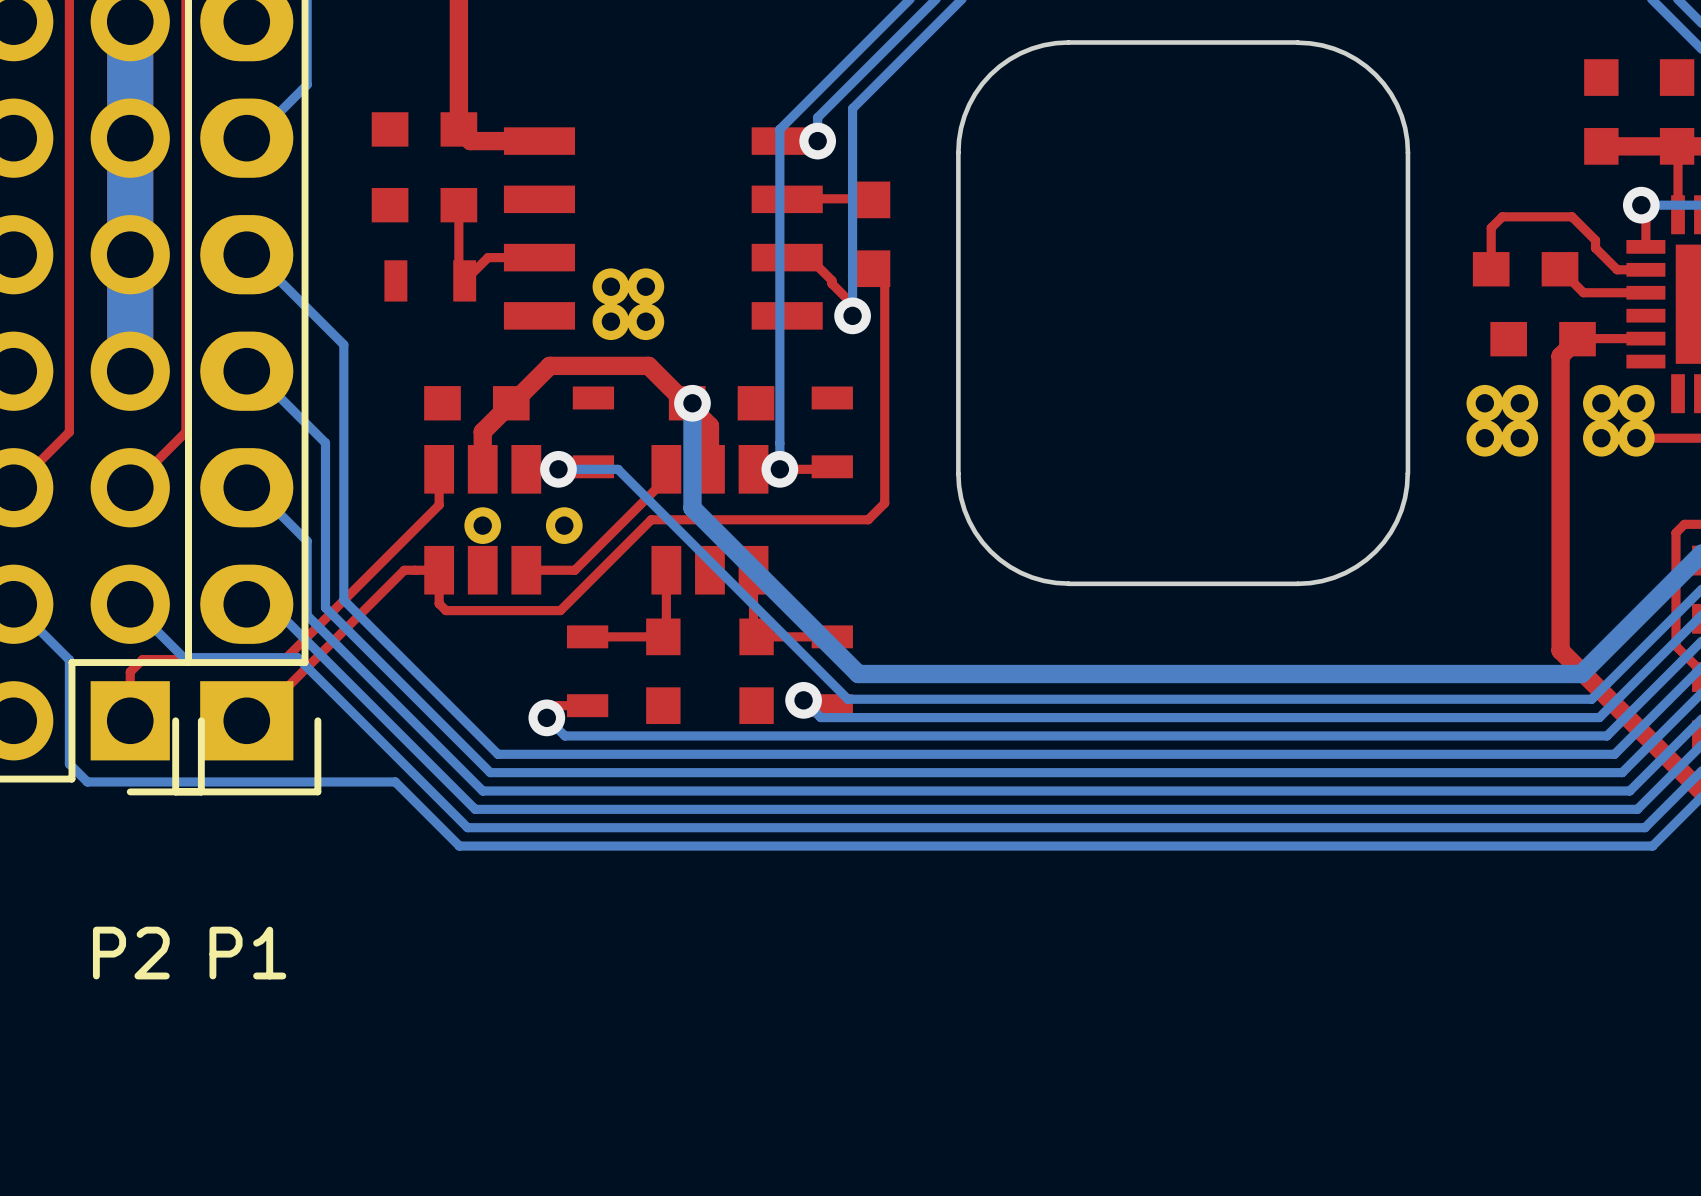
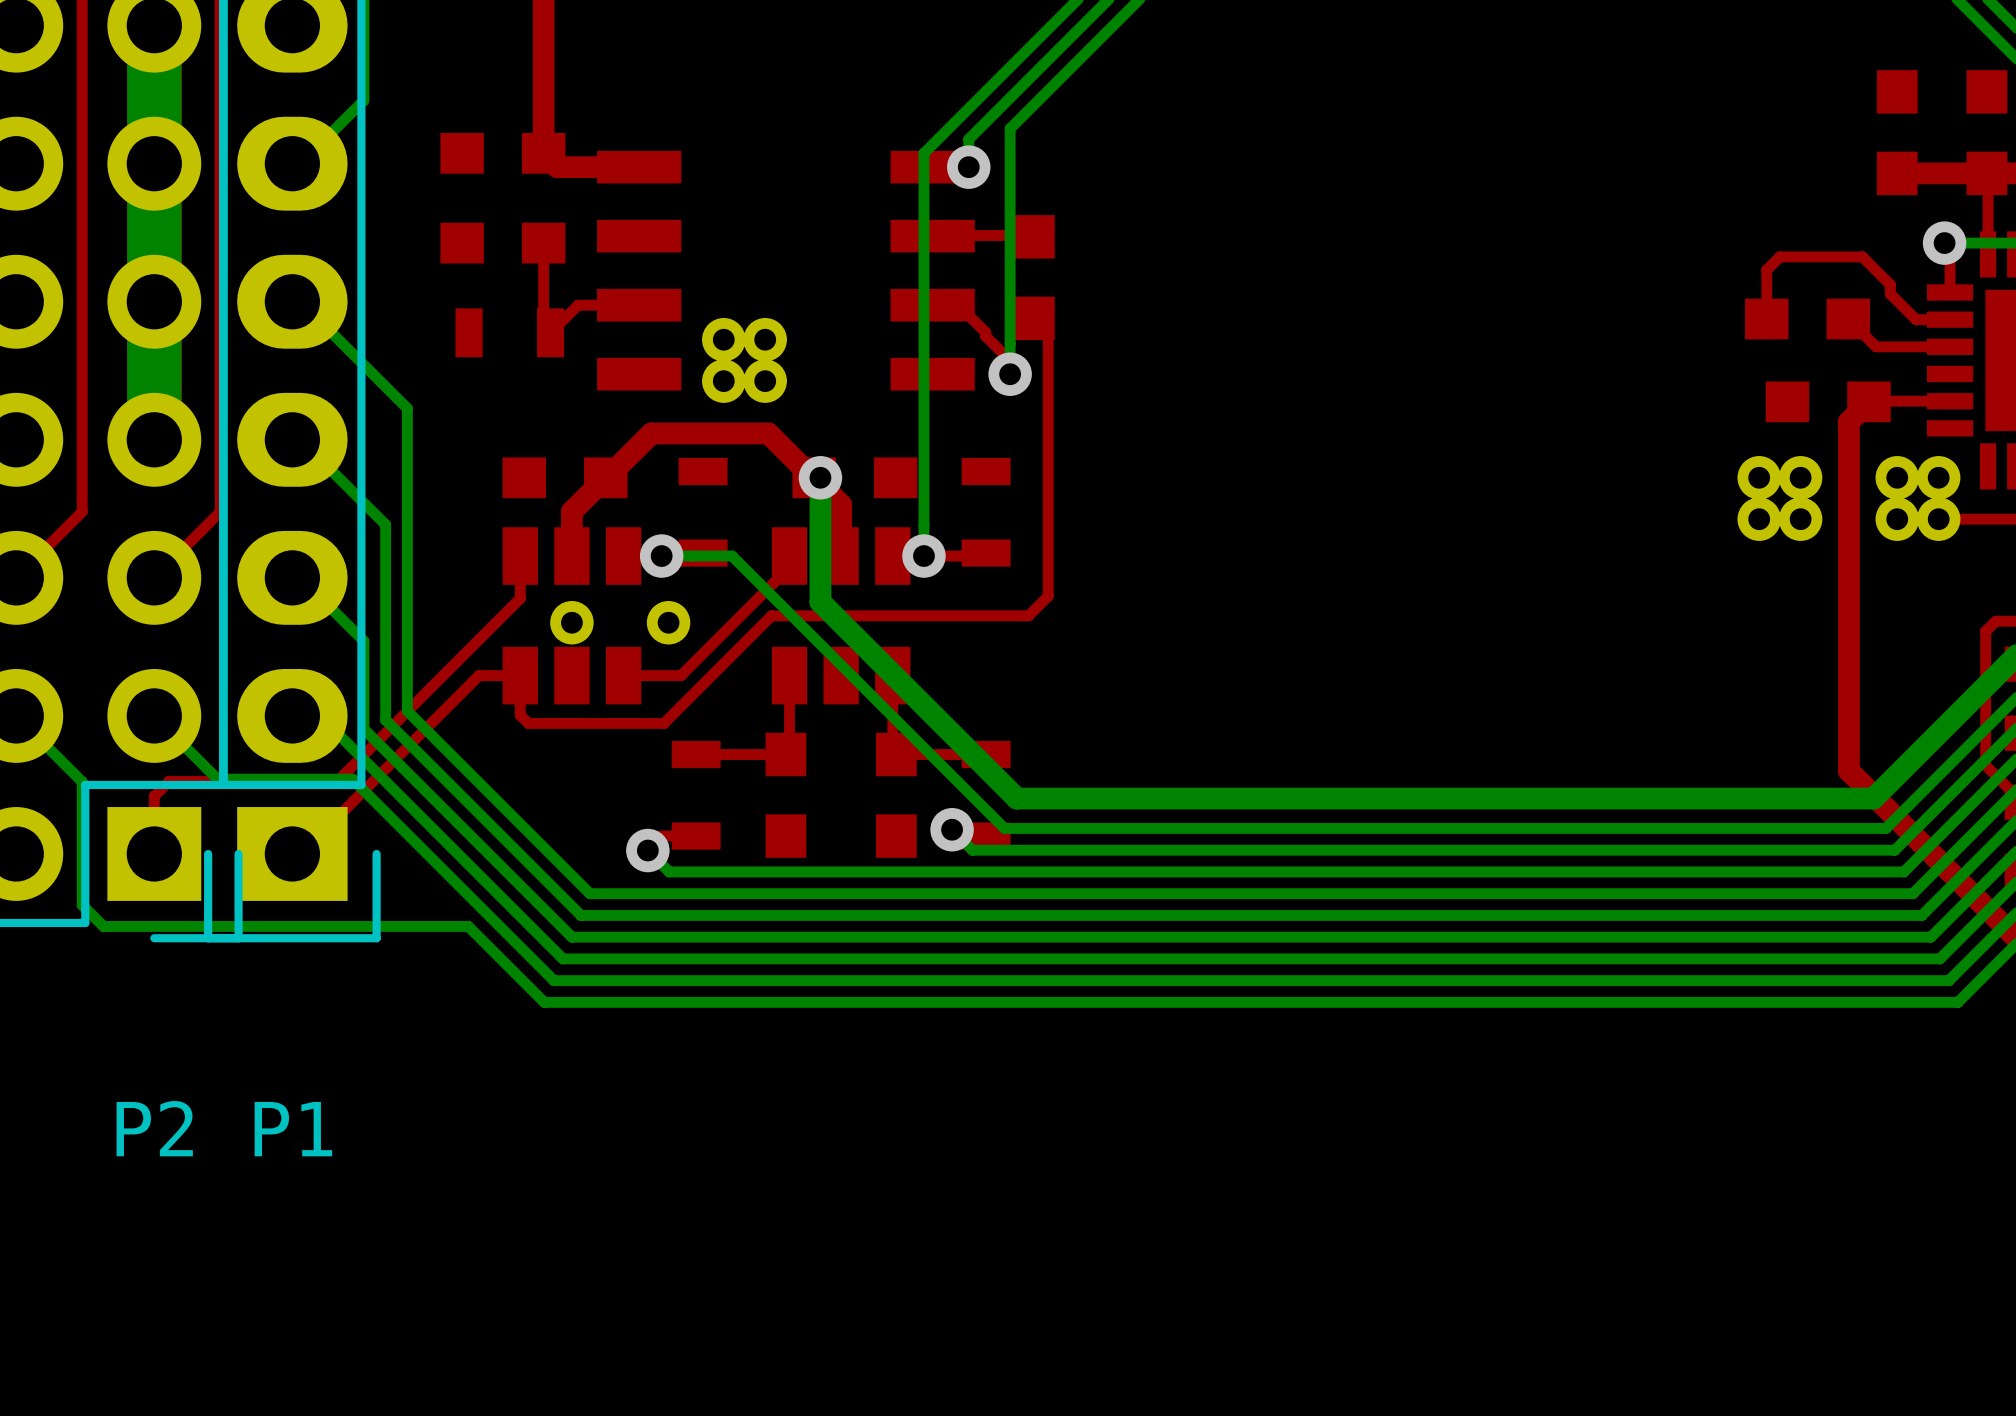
drawing: [956, 40, 1411, 587] -> none

